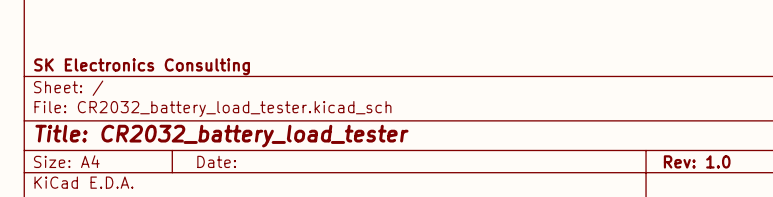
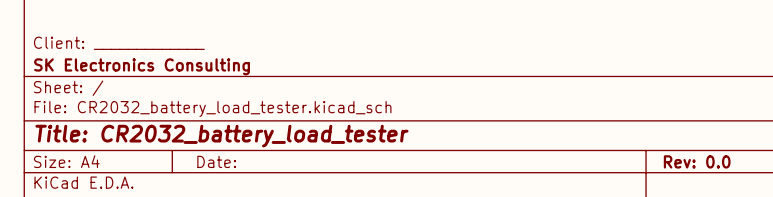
title block: none -> Client: _____________ (119, 43)
title block: Rev: 1.0 (697, 161) -> Rev: 0.0 (697, 161)

